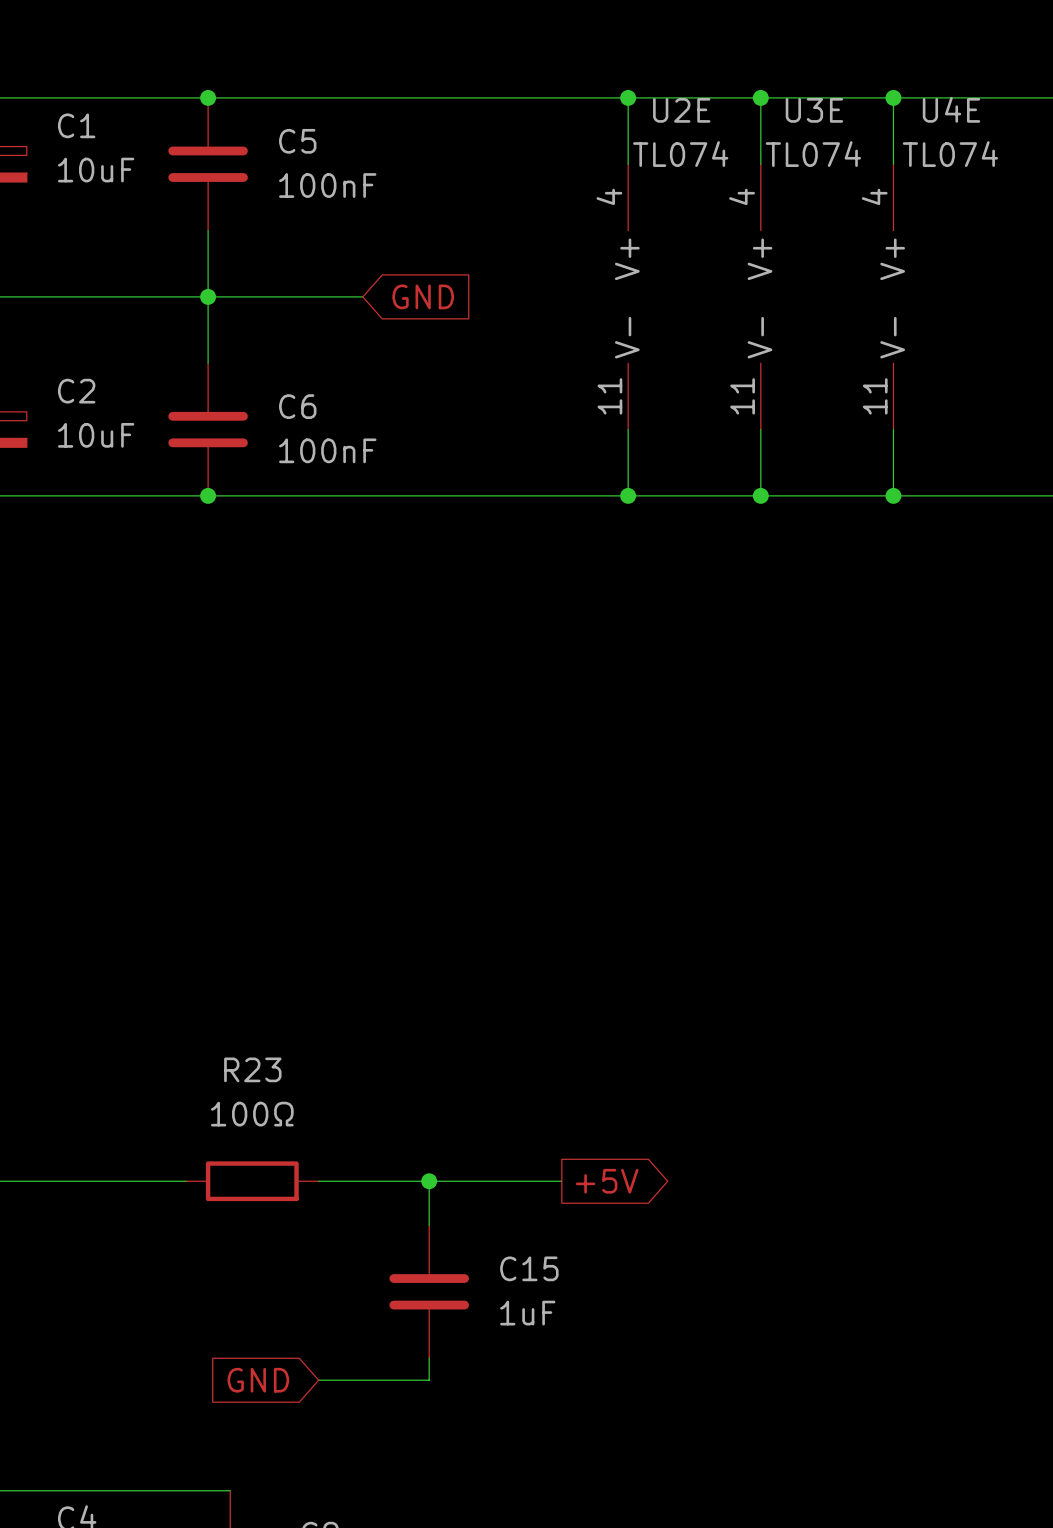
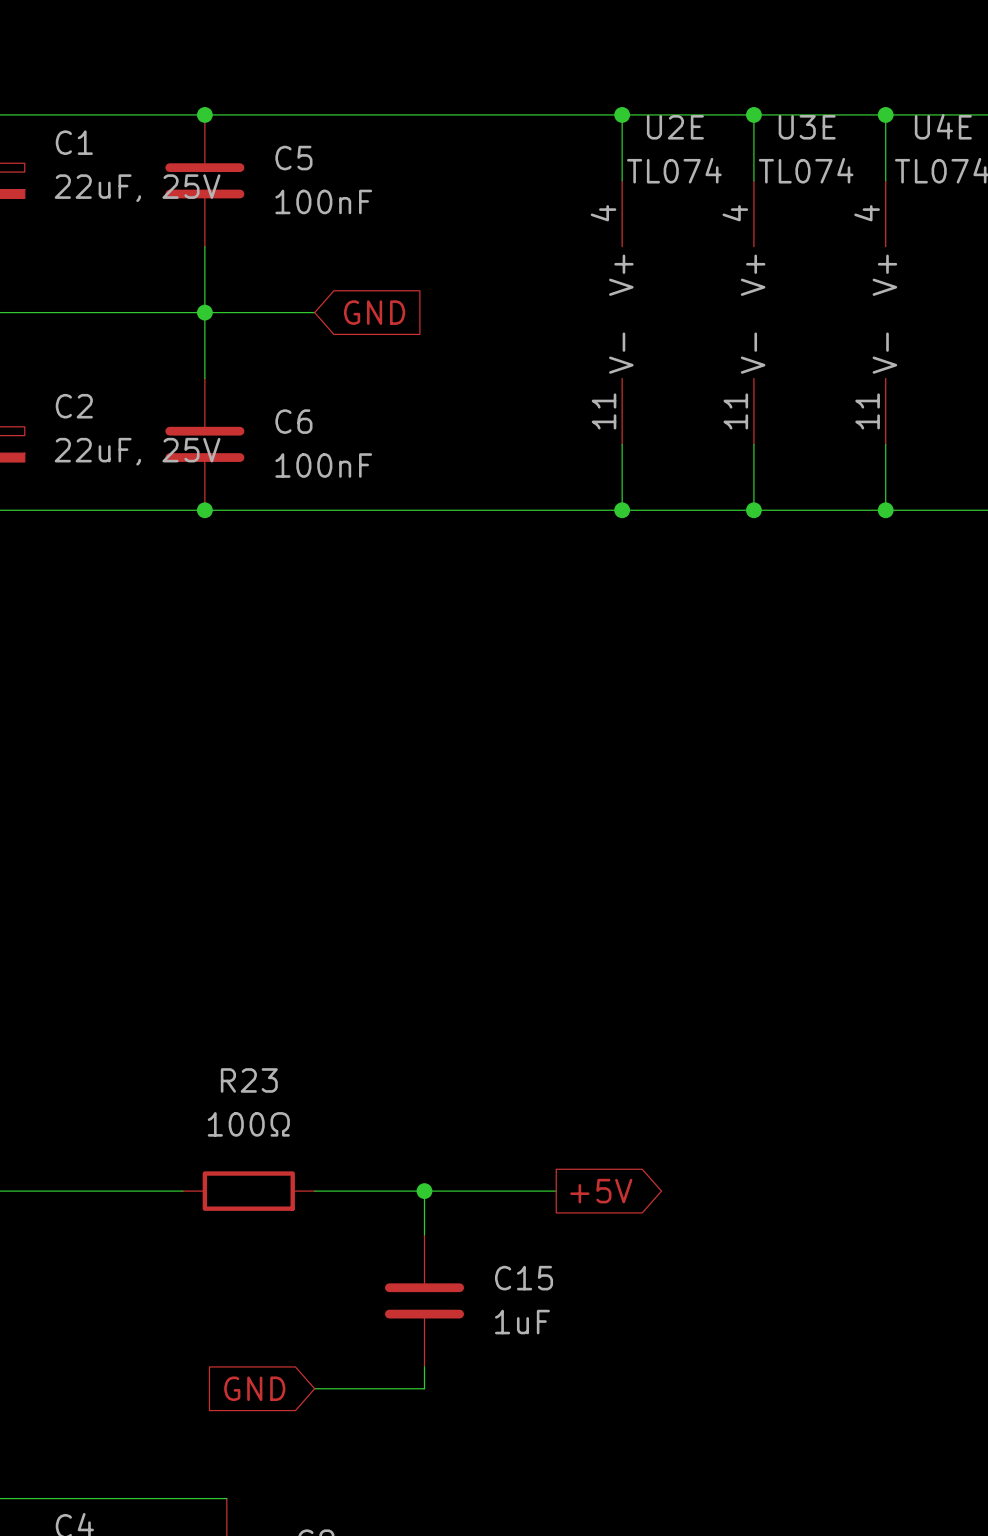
C1 value: 10uF (96, 170) -> 22uF, 25V (137, 188)
wire: (318, 296) (362, 296) -> none
global label position: GND (423, 296) -> GND (374, 312)
C2 value: 10uF (96, 435) -> 22uF, 25V (137, 451)

